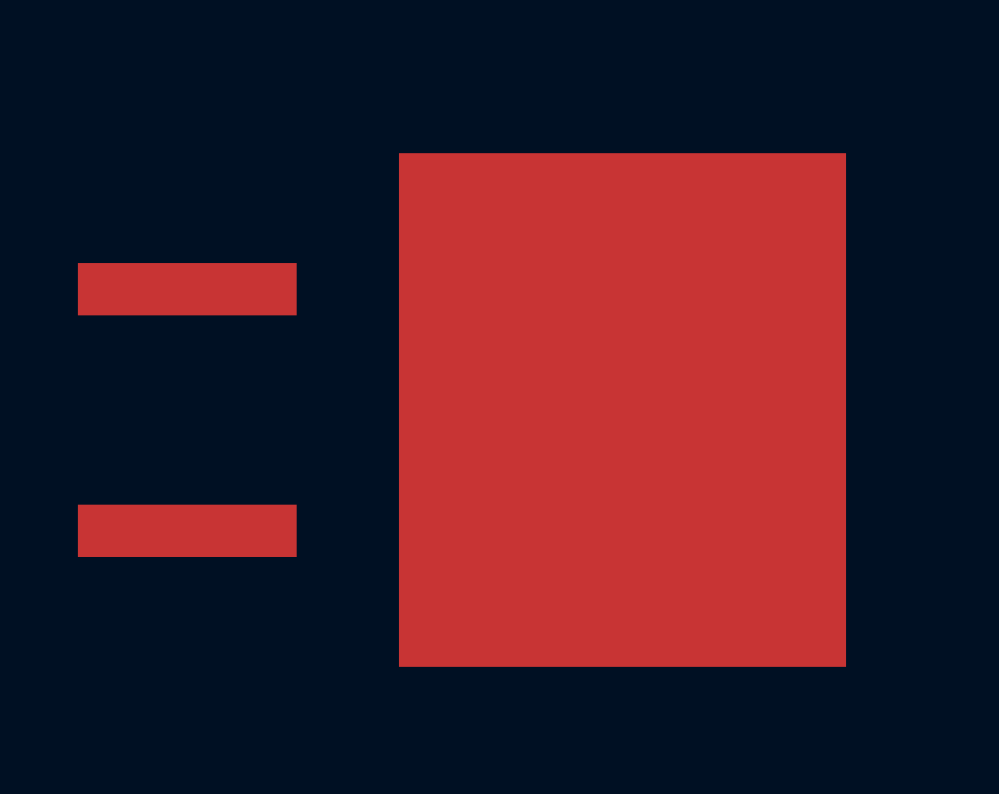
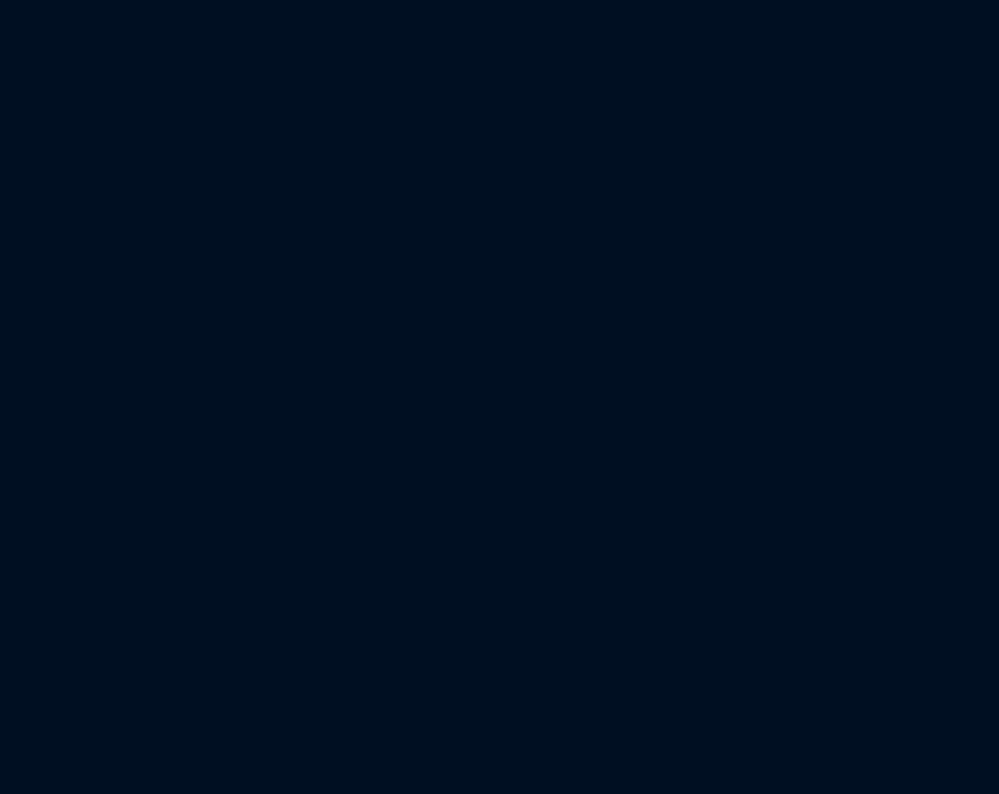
part: (461, 410) -> none

